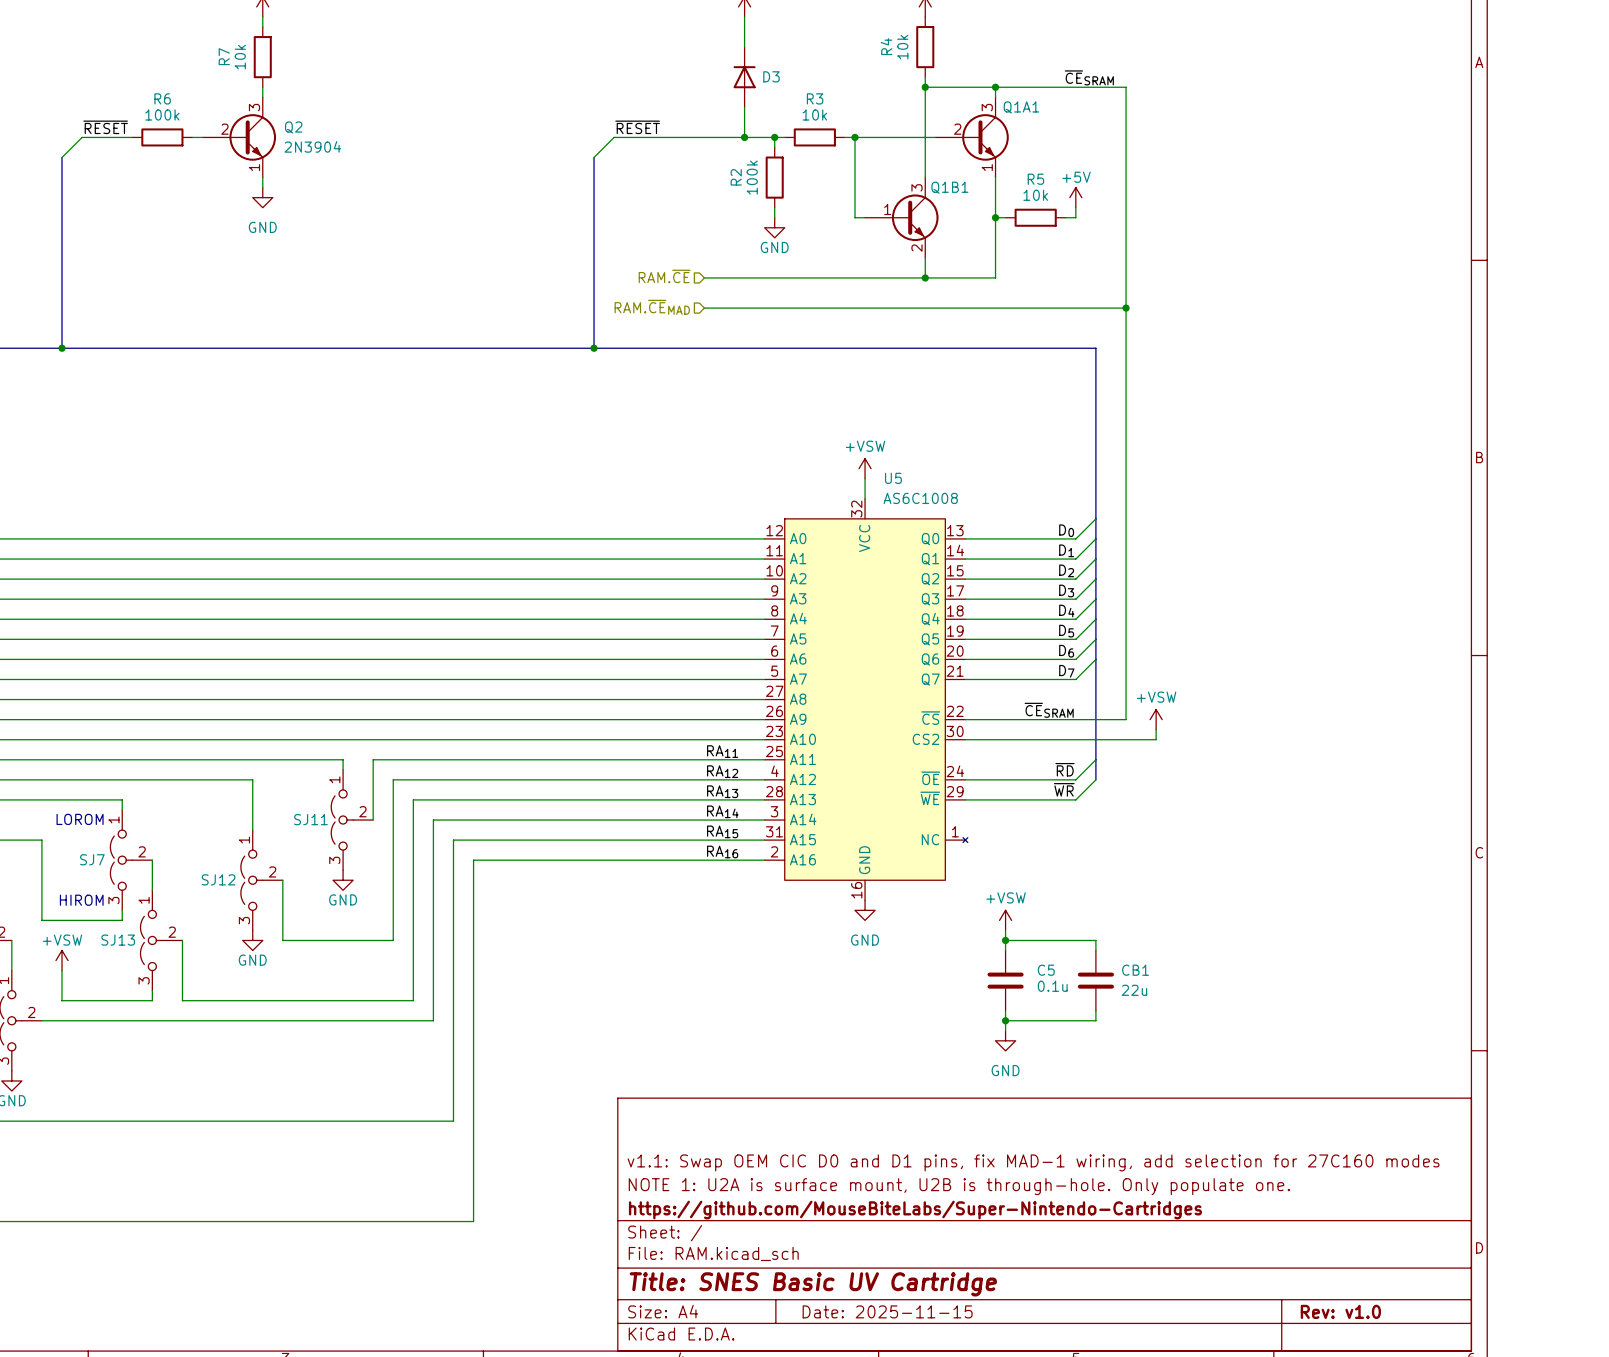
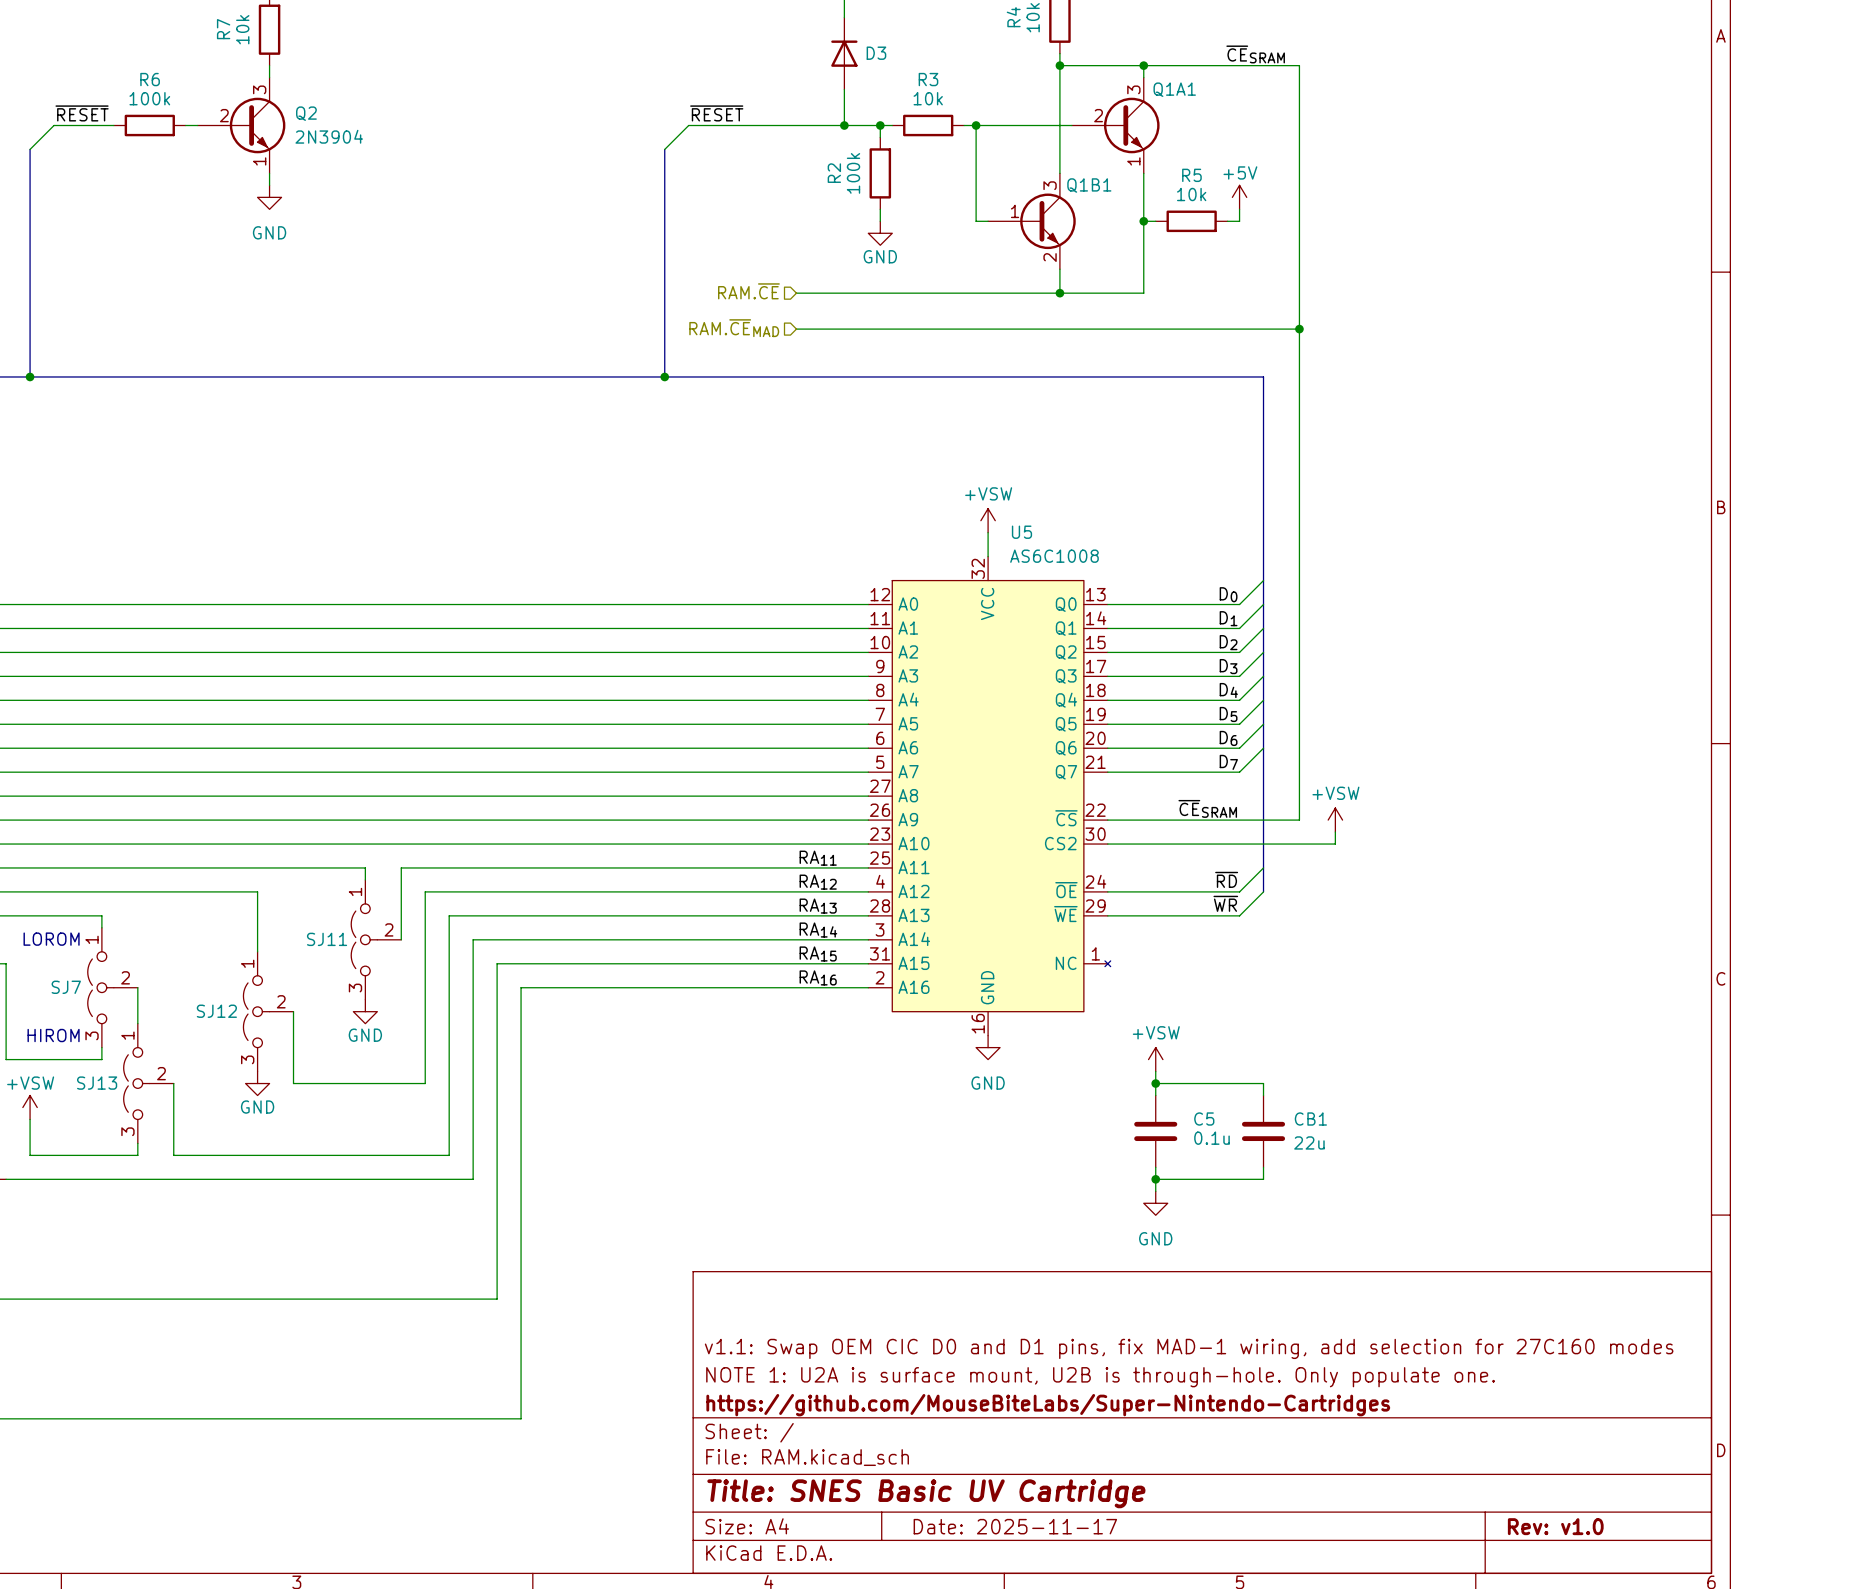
title block: Date: 2025-11-15 (887, 1311) -> Date: 2025-11-17 (1015, 1526)

